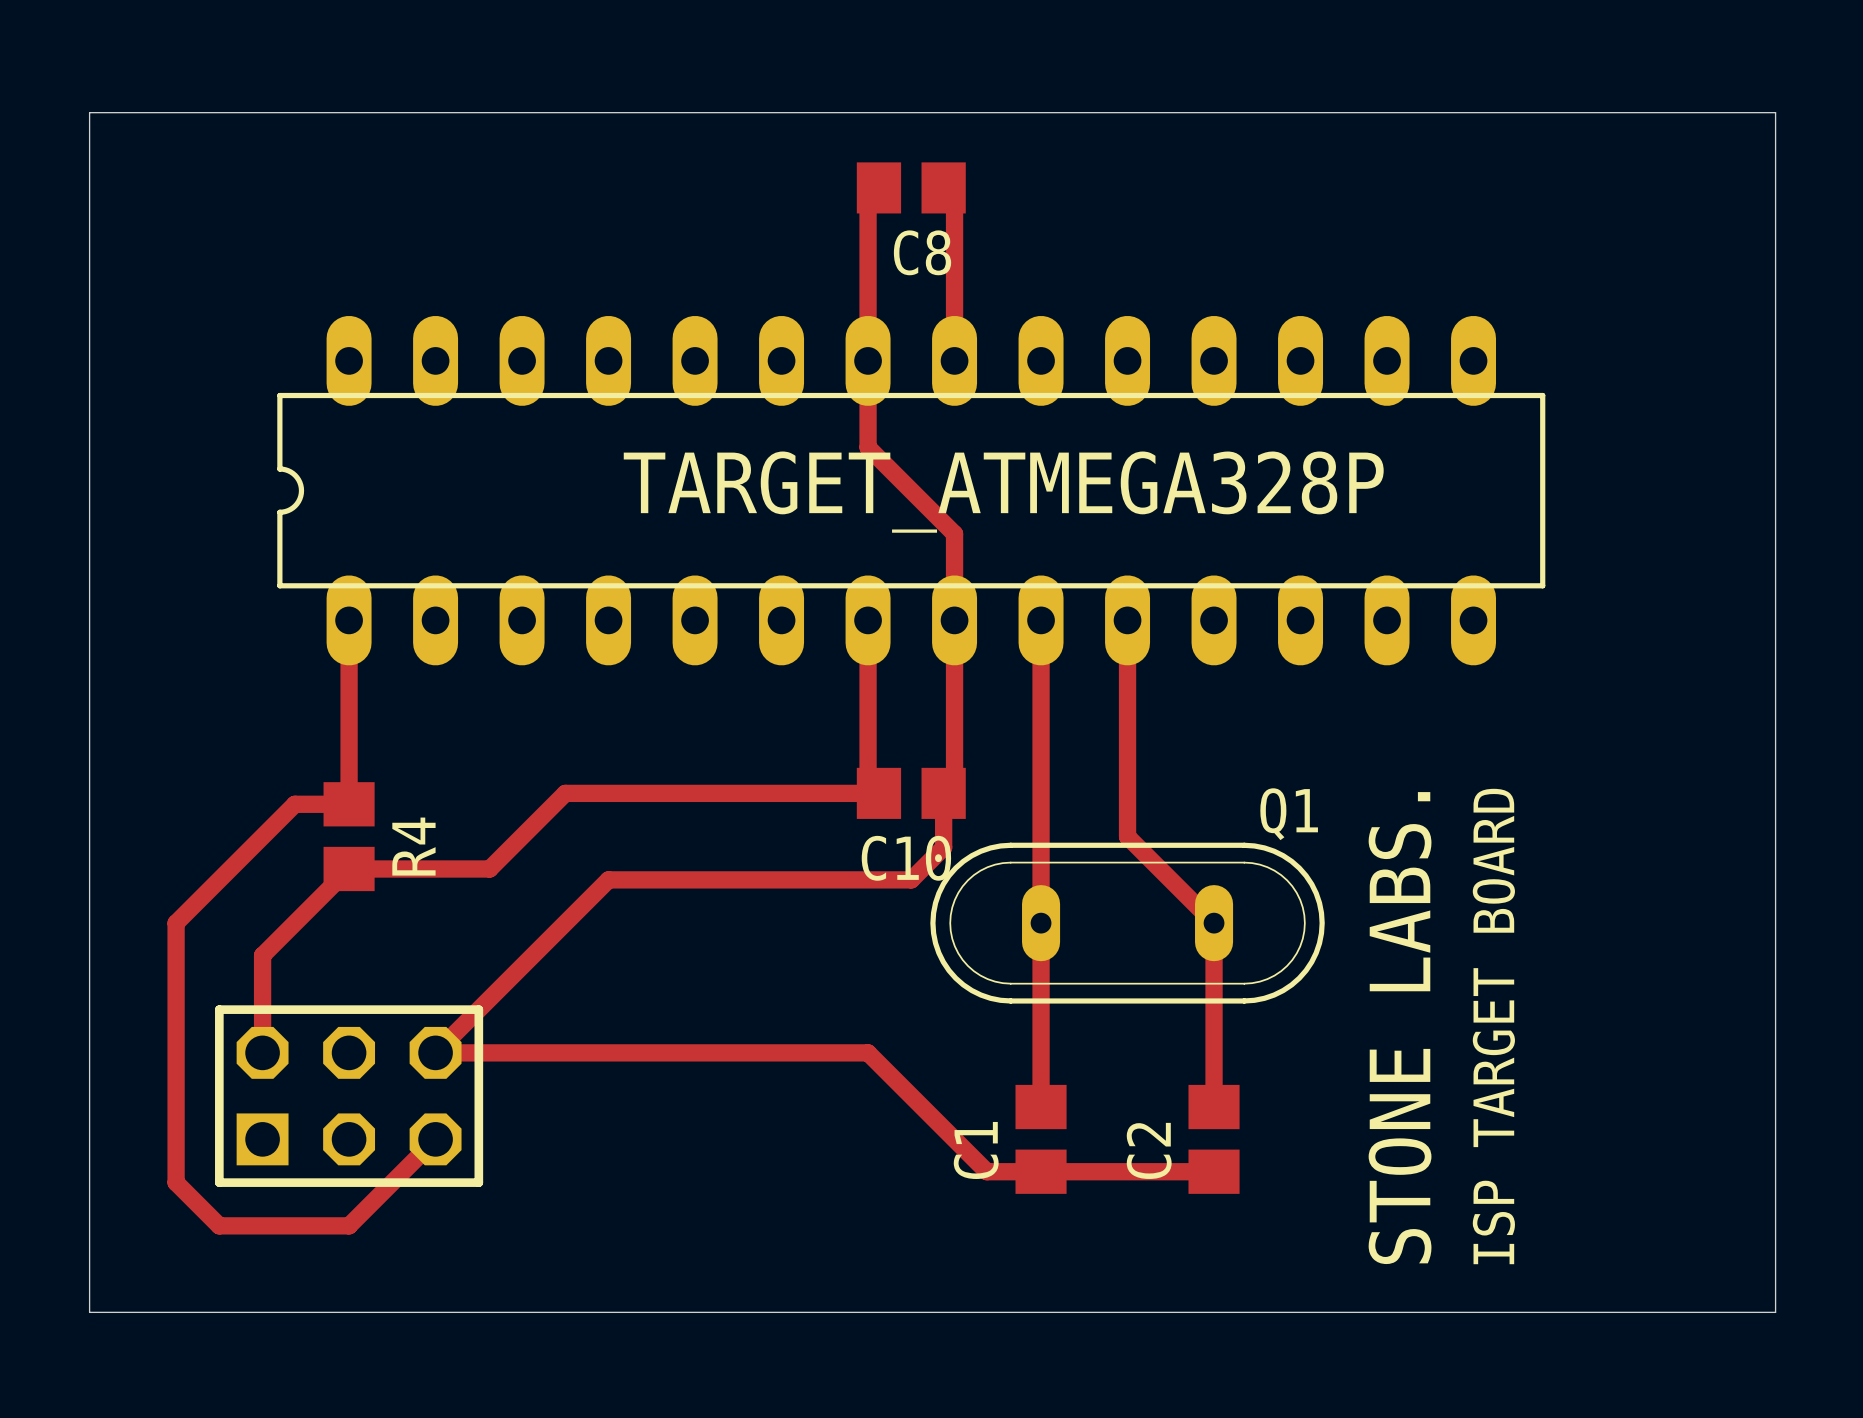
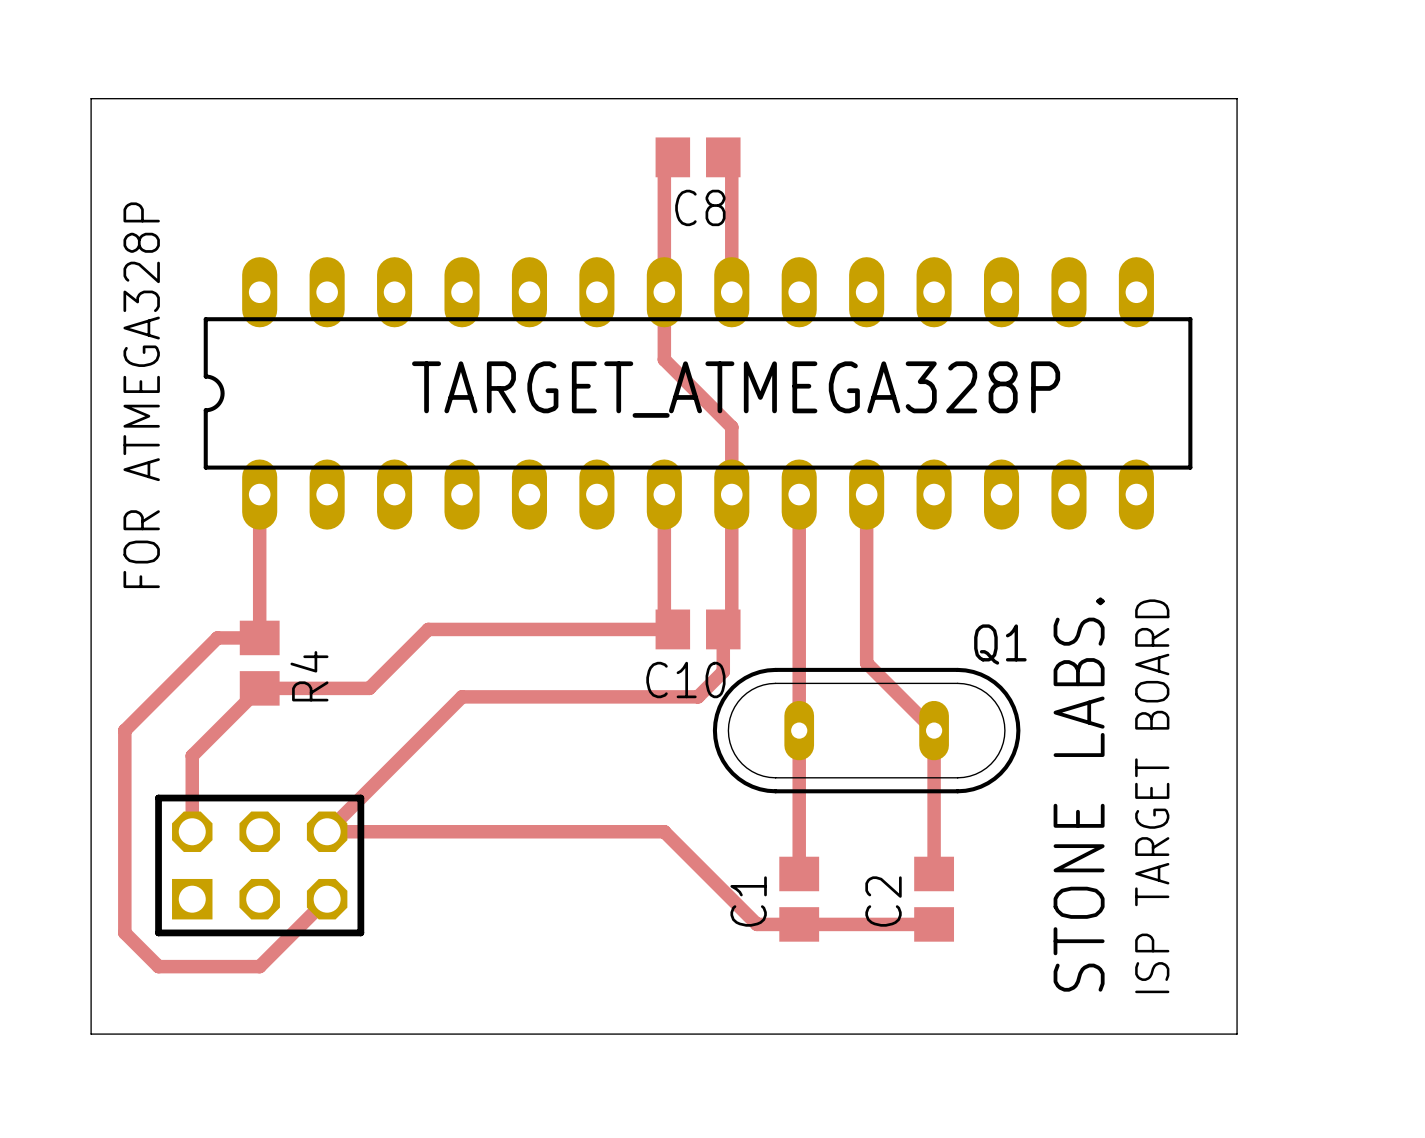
board edge: (132, 112) (89, 112) (89, 1312) (132, 1312) -> (91, 98) (91, 1034)
board edge: (1602, 112) (1775, 112) (1775, 1312) (1602, 1312) -> (1237, 98) (1237, 1034)
text: none -> FOR ATMEGA328P (141, 395)

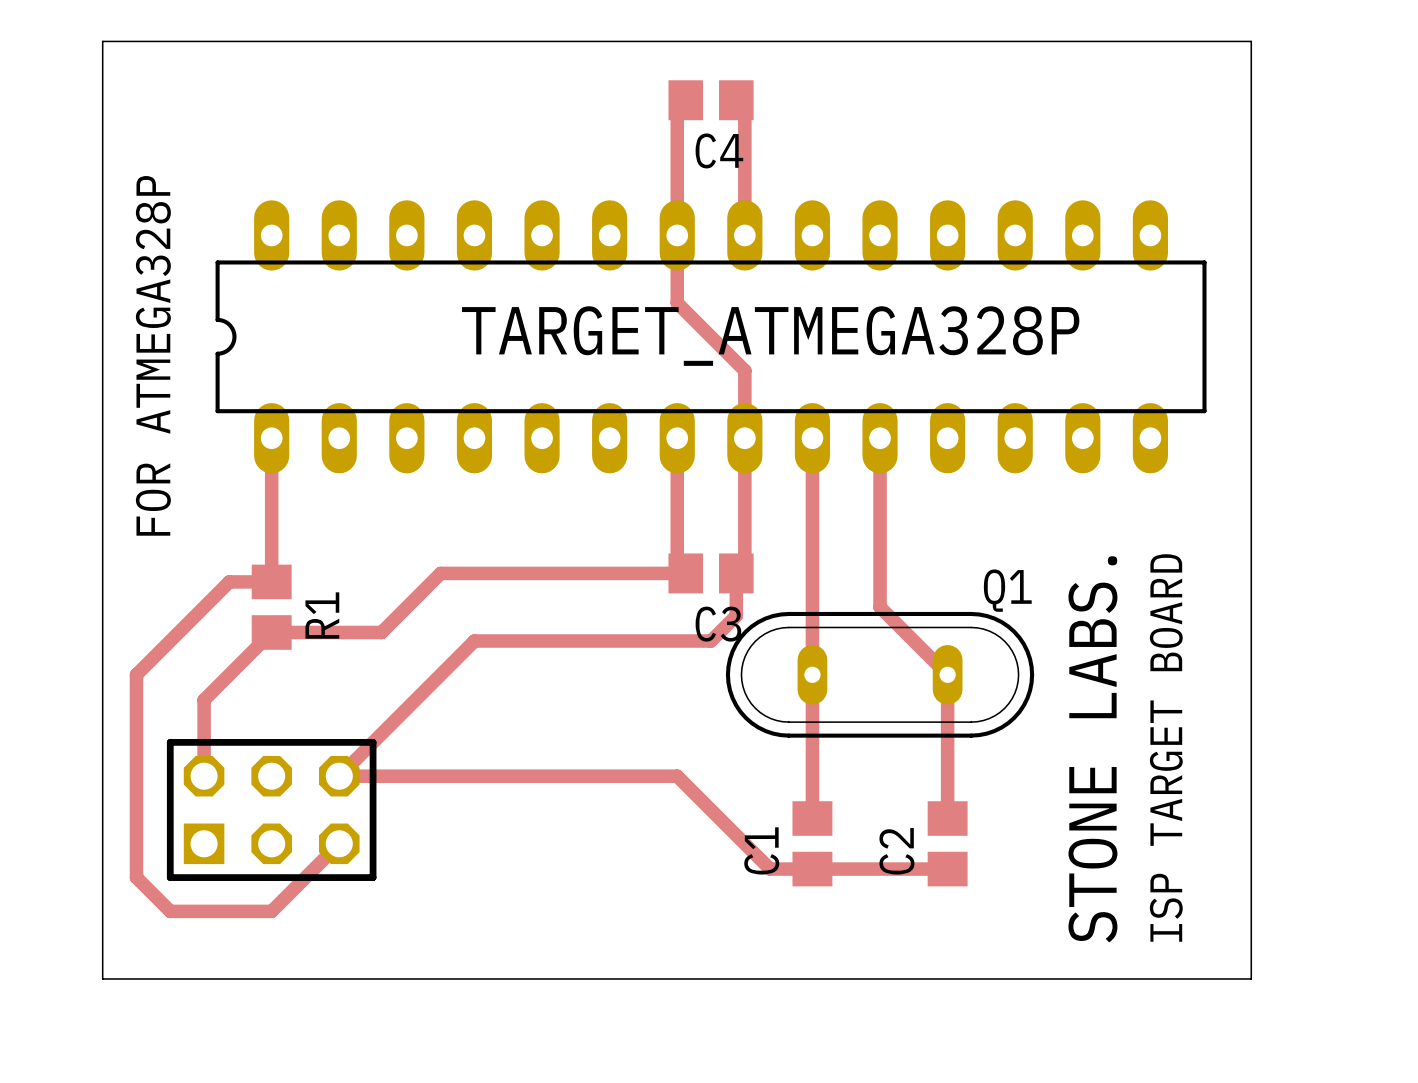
C8 name: C8 (700, 207) -> C4 (719, 150)
R4 name: R4 (309, 676) -> R1 (322, 615)
C10 name: C10 (685, 680) -> C3 (718, 624)

